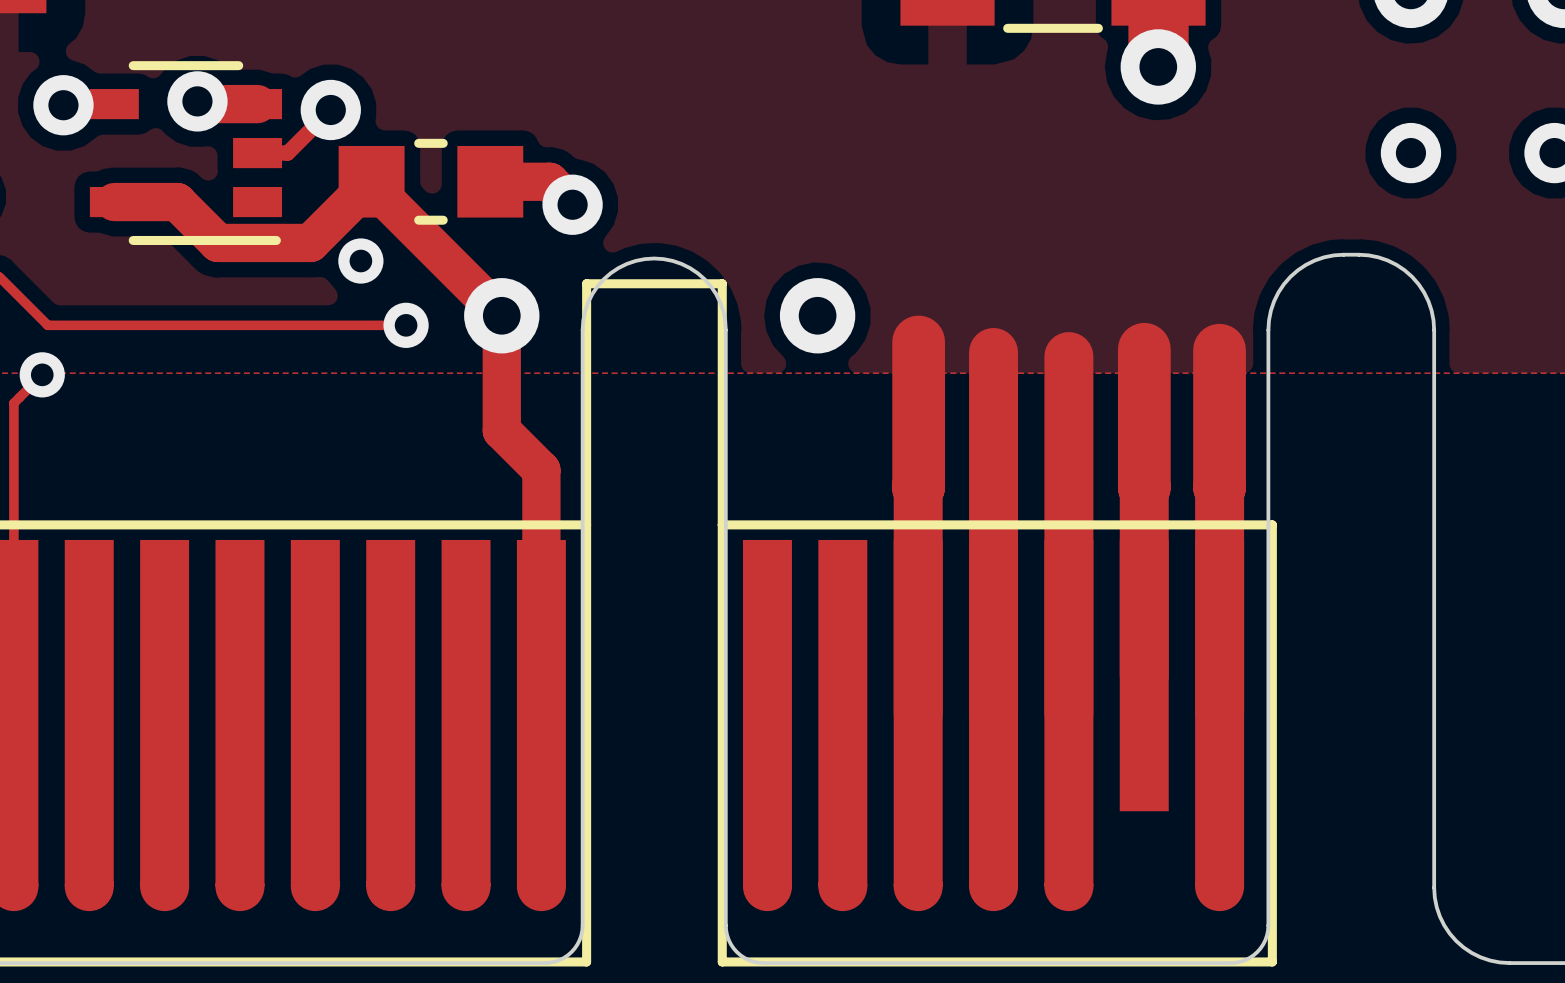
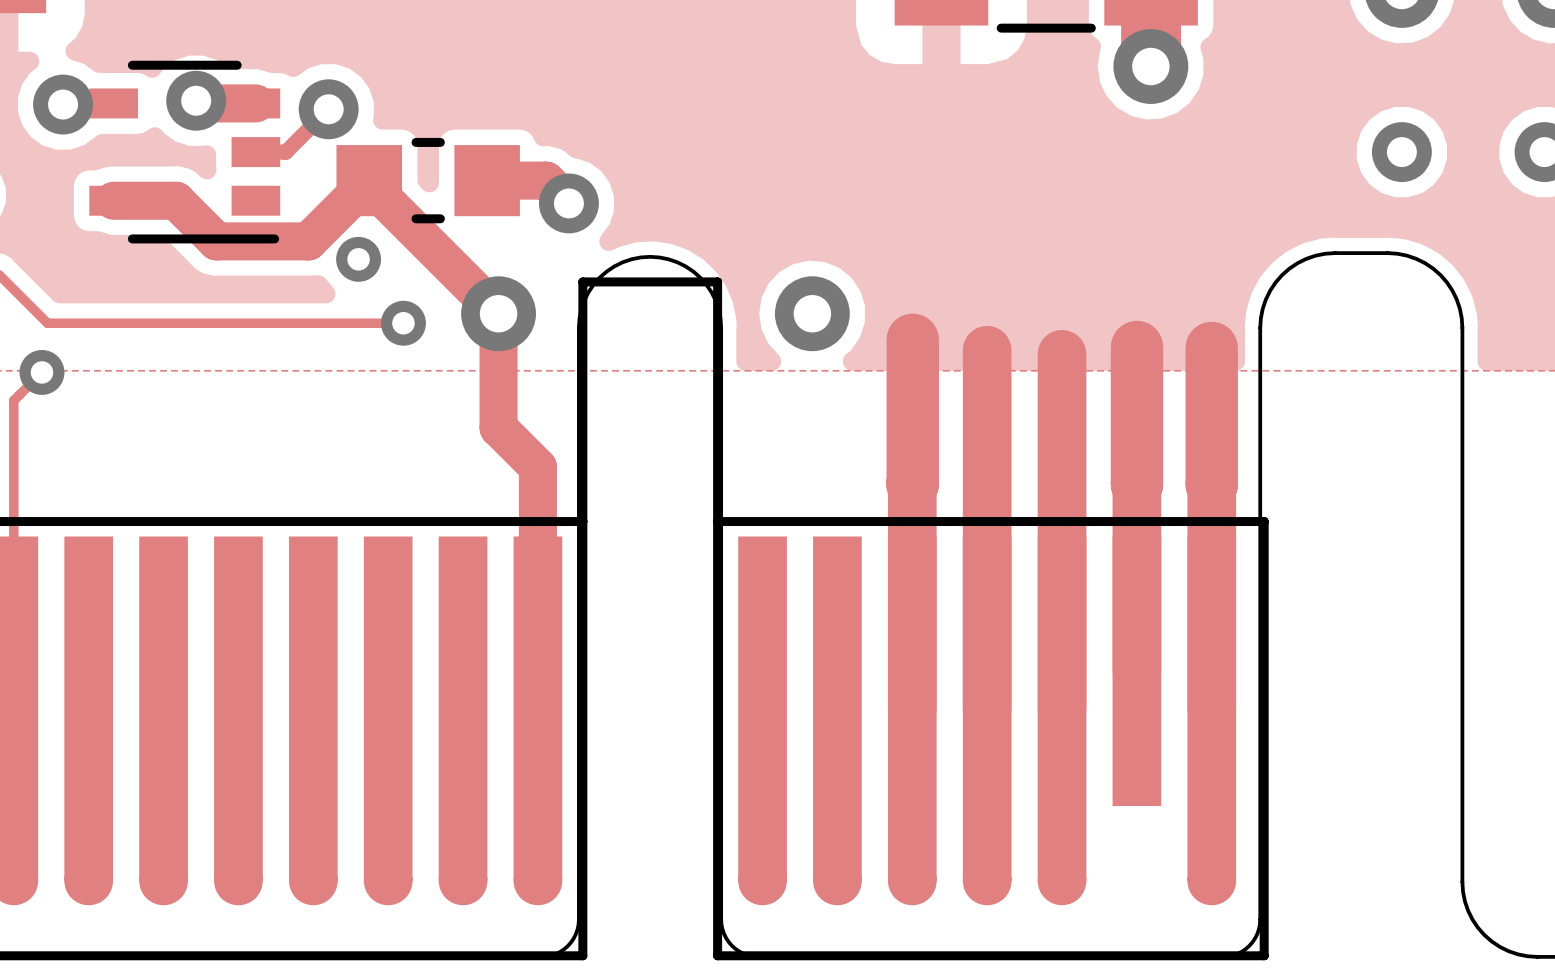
board edge: (1358, 254) (1387, 260) (1412, 276) (1424, 292) (1433, 320) (1434, 887) (1436, 907) (1449, 933) (1471, 952) (1499, 962) (1547, 963) -> (1350, 253) (1397, 253) (1424, 263) (1446, 282) (1459, 308) (1462, 327) (1463, 891) (1472, 919) (1484, 934) (1508, 951) (1537, 956)

